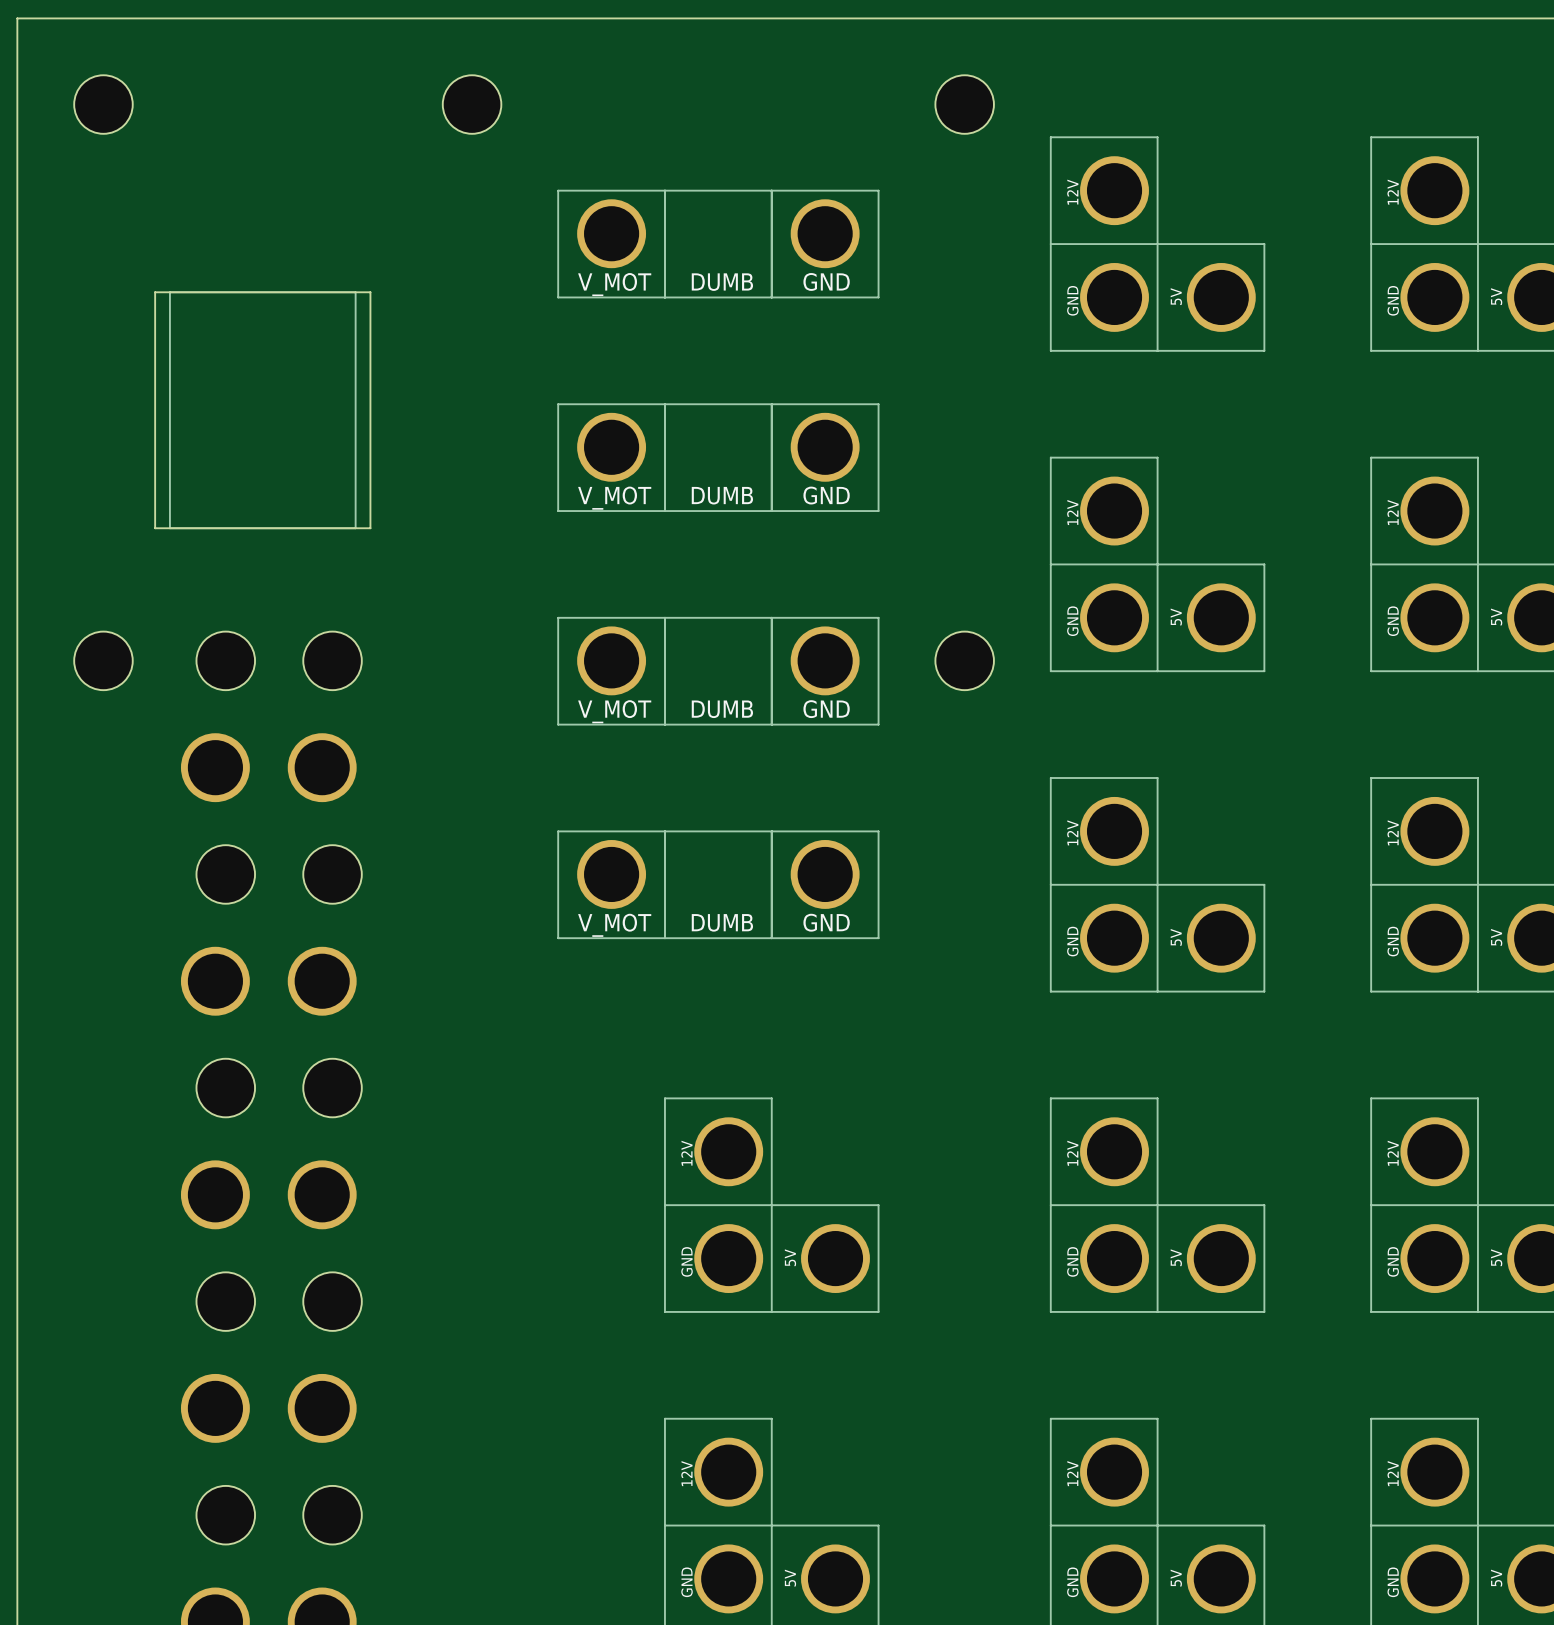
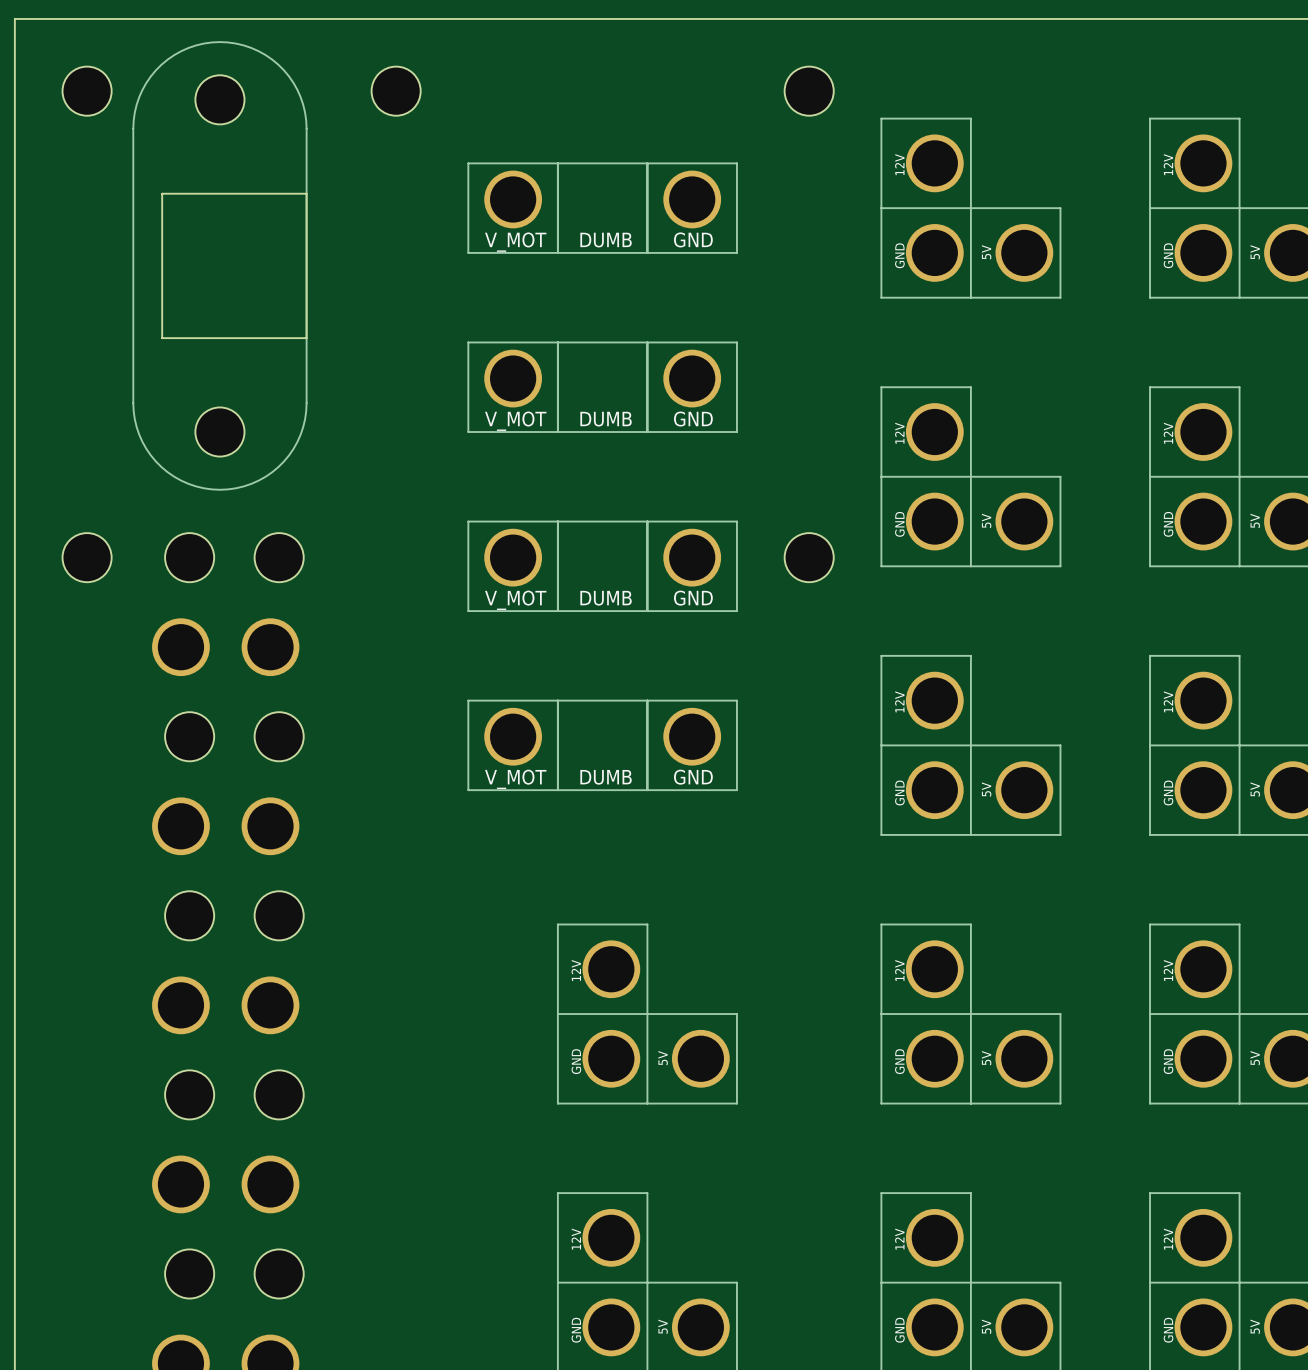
drawing: [154, 291, 372, 530] -> none
part: none -> (219, 265)

